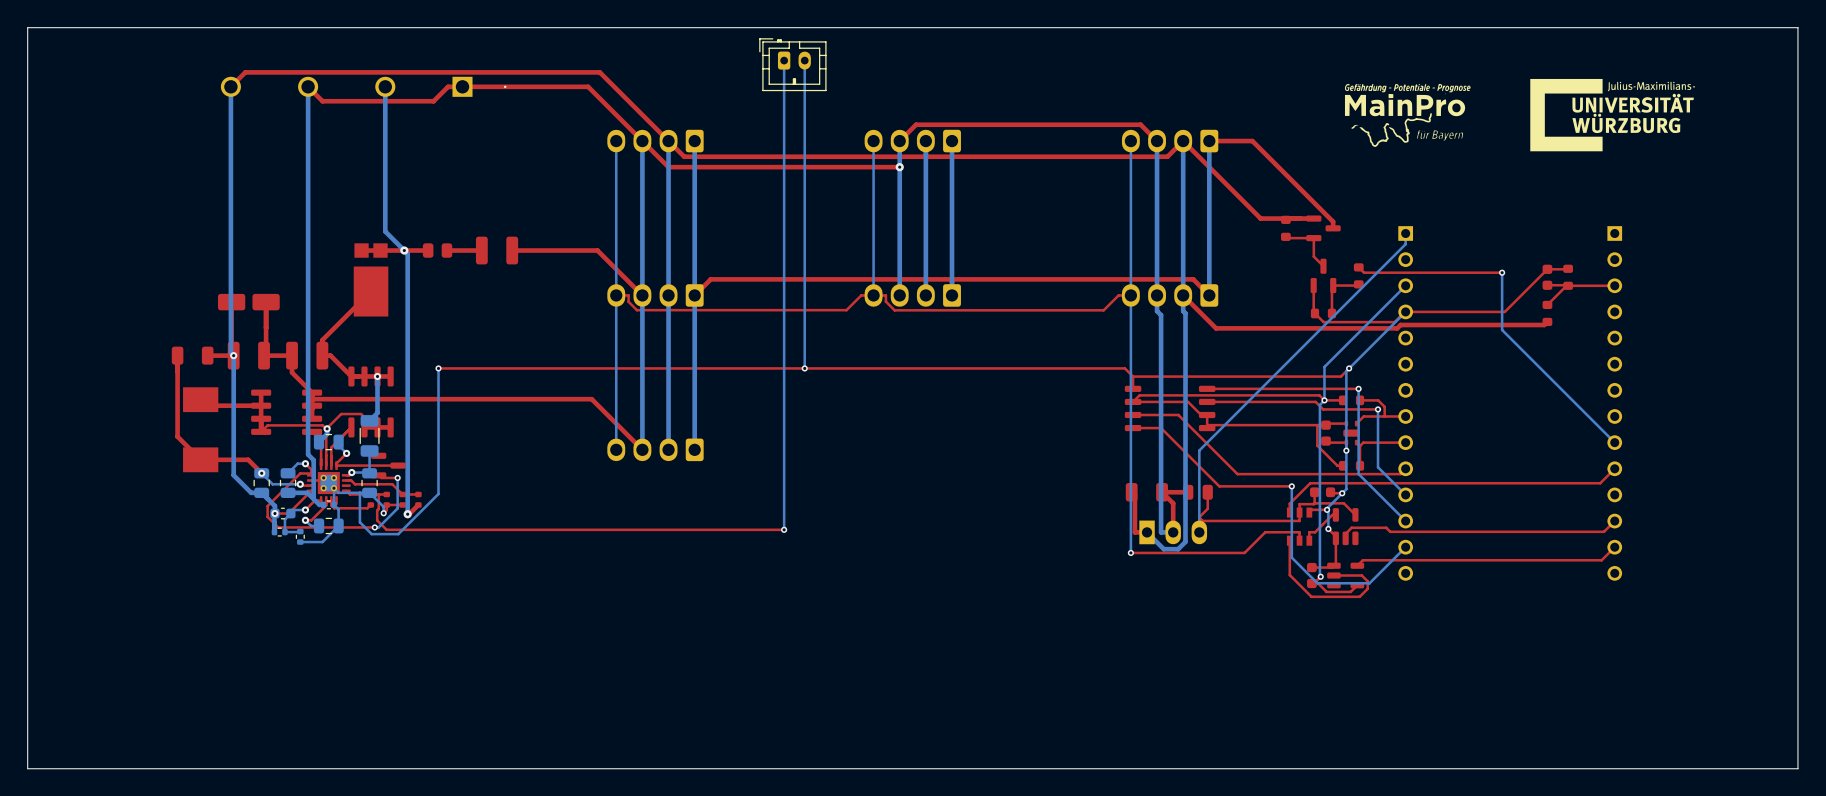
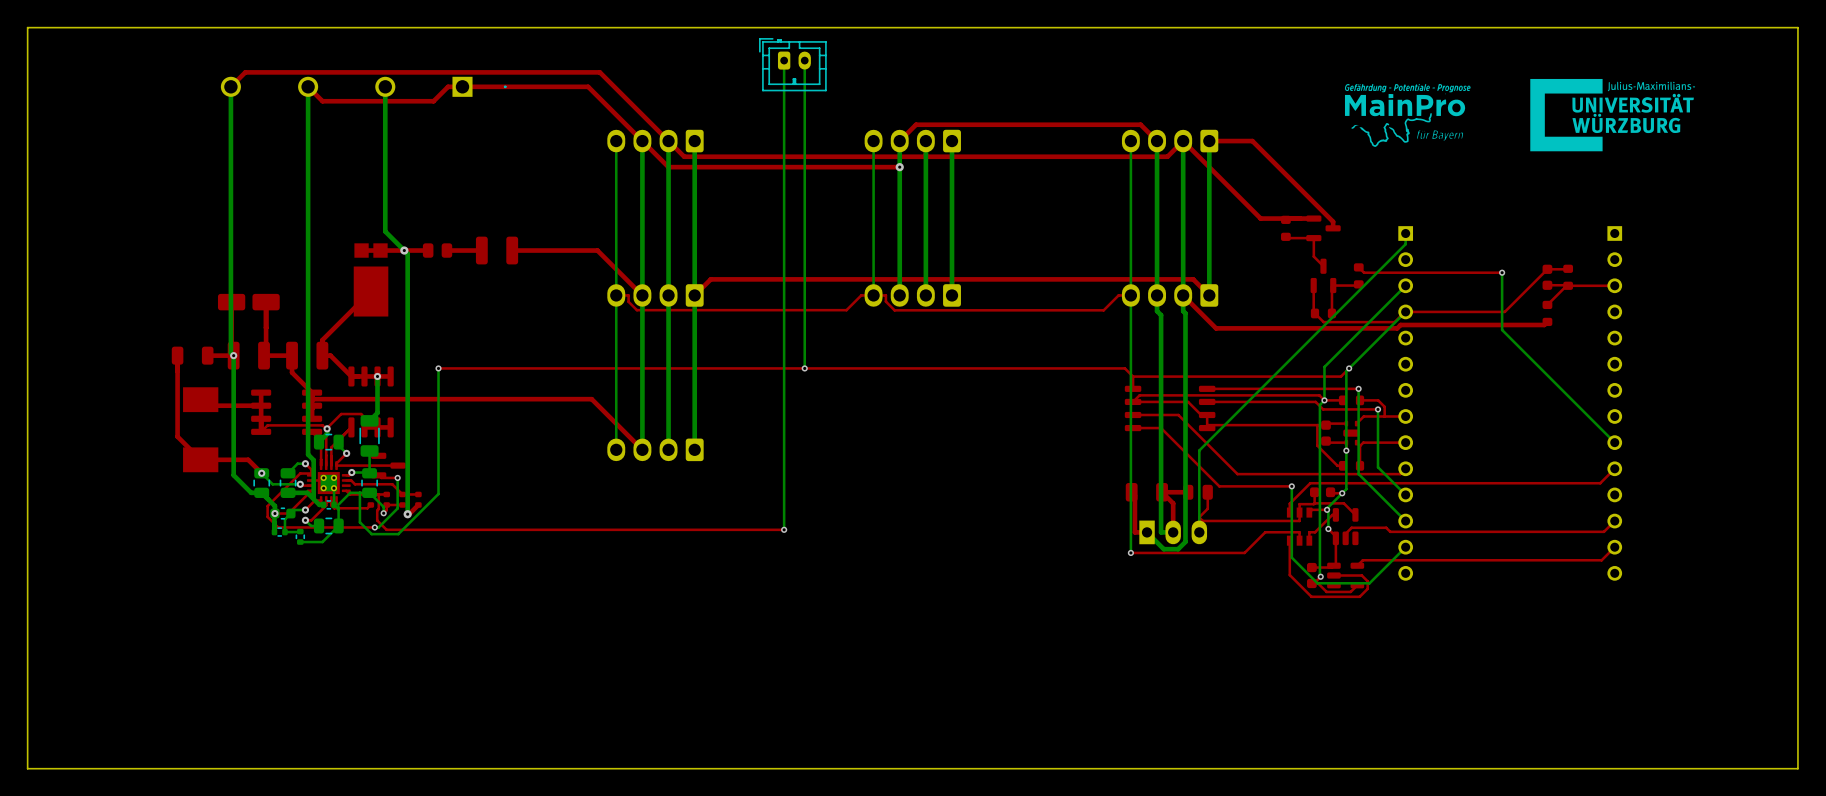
bottom track: (333, 488) (338, 492) (350, 492) -> (338, 504) (350, 492)

